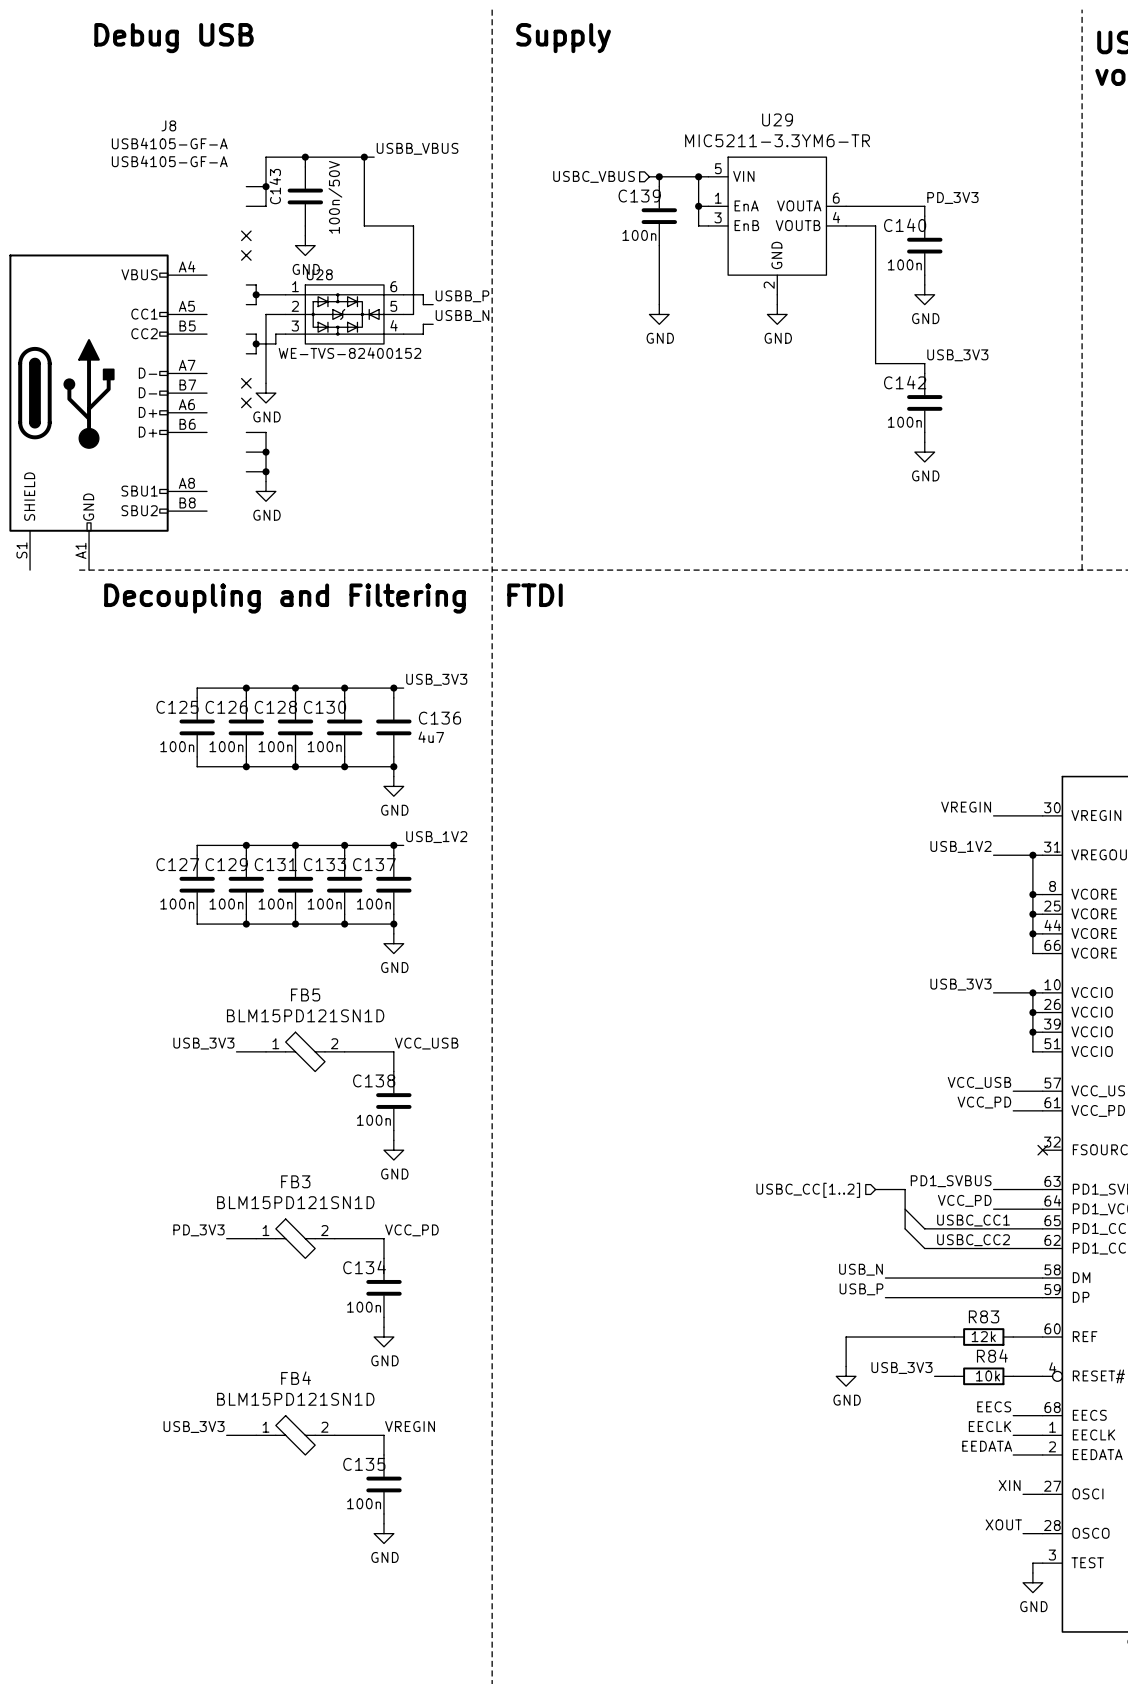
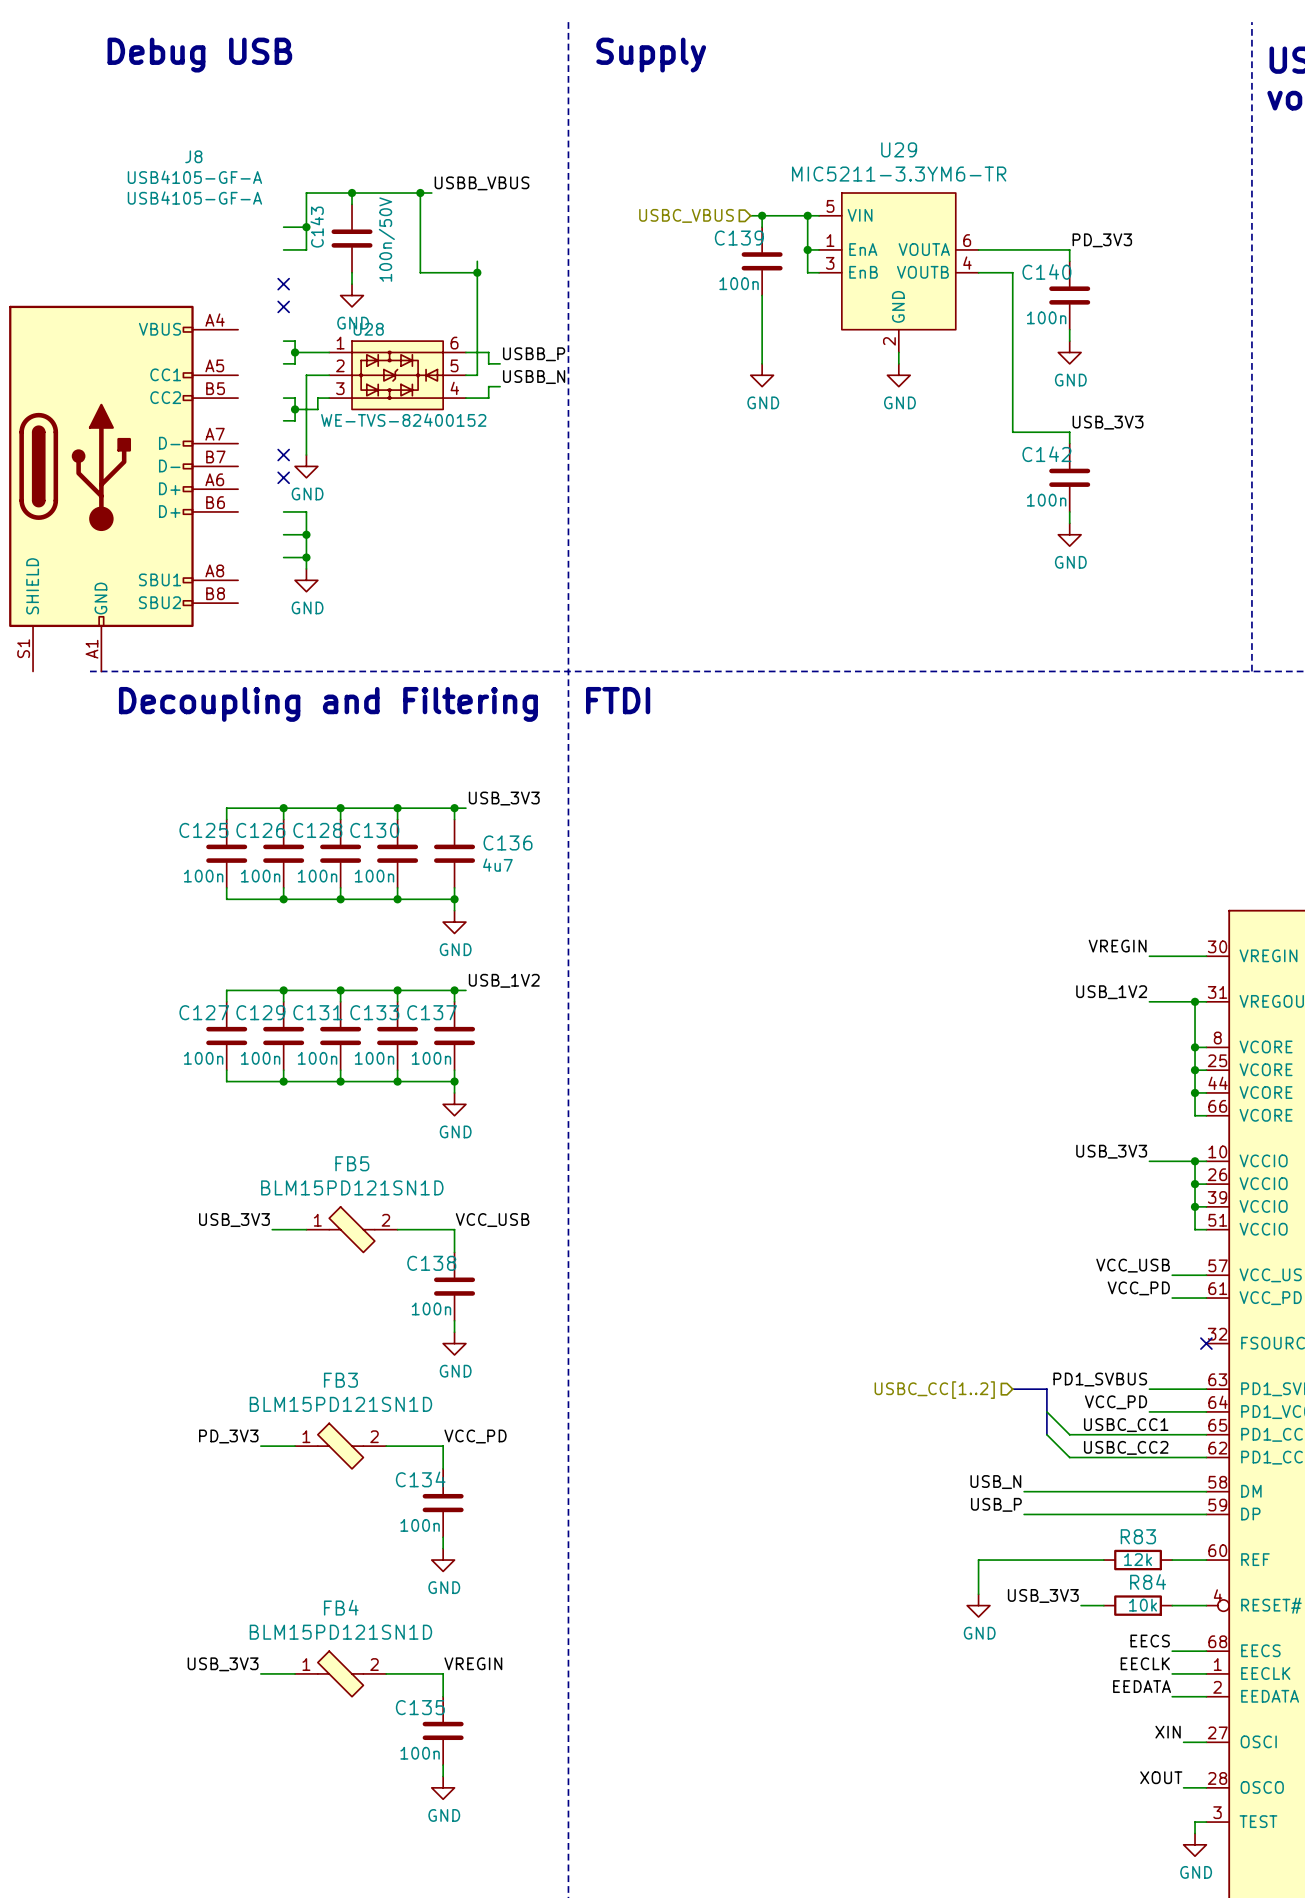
wire: none -> (477, 261) (477, 272)
junction: none -> (477, 272)

